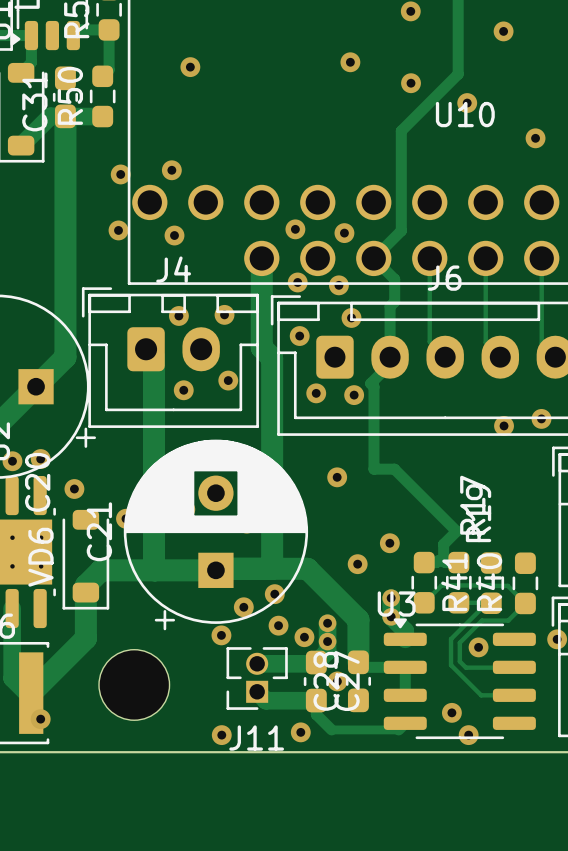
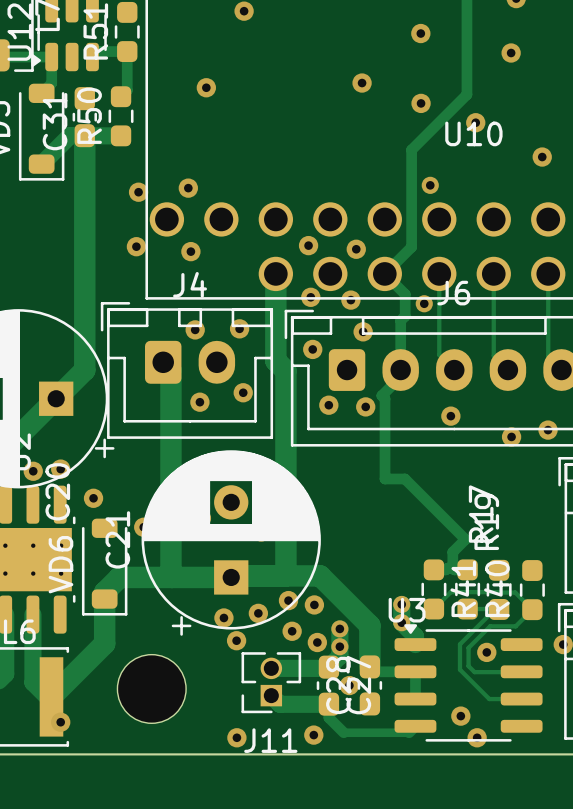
via: none -> (430, 185)
via: none -> (424, 303)
via: none -> (450, 416)
via: (337, 477) -> none
via: (389, 543) -> none
via: (357, 564) -> none
via: none -> (314, 604)
via: none -> (223, 617)

